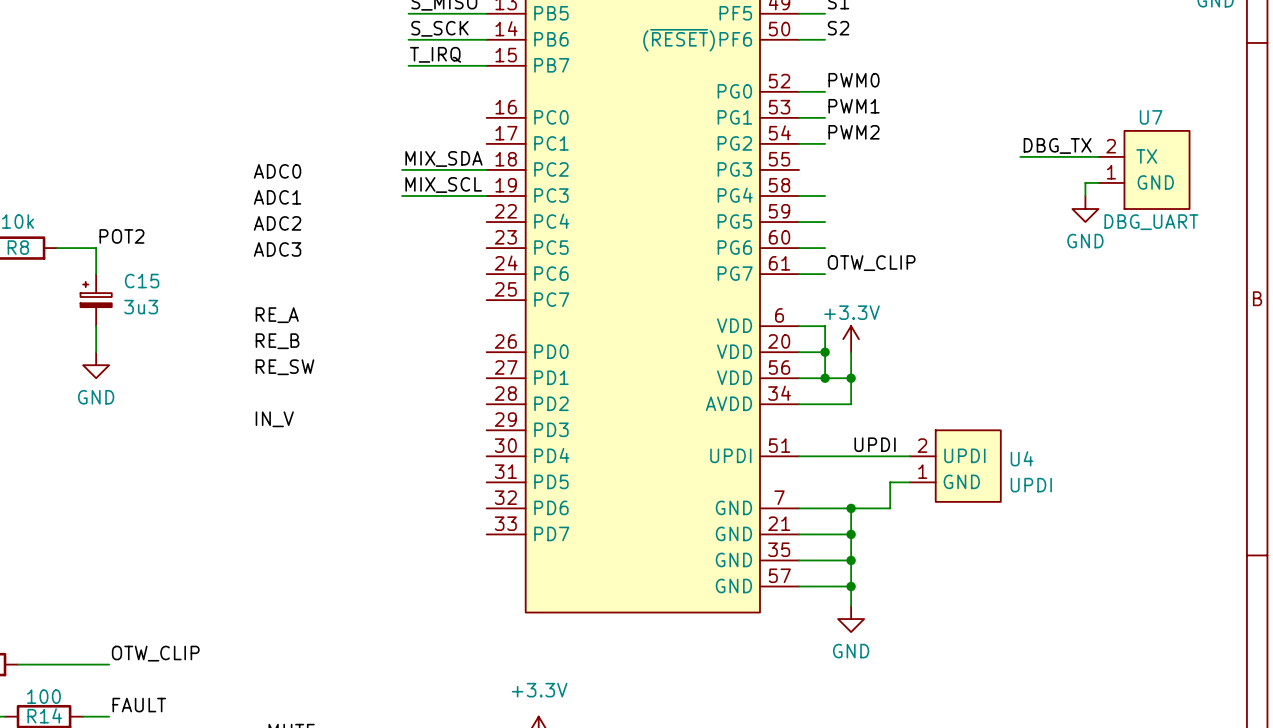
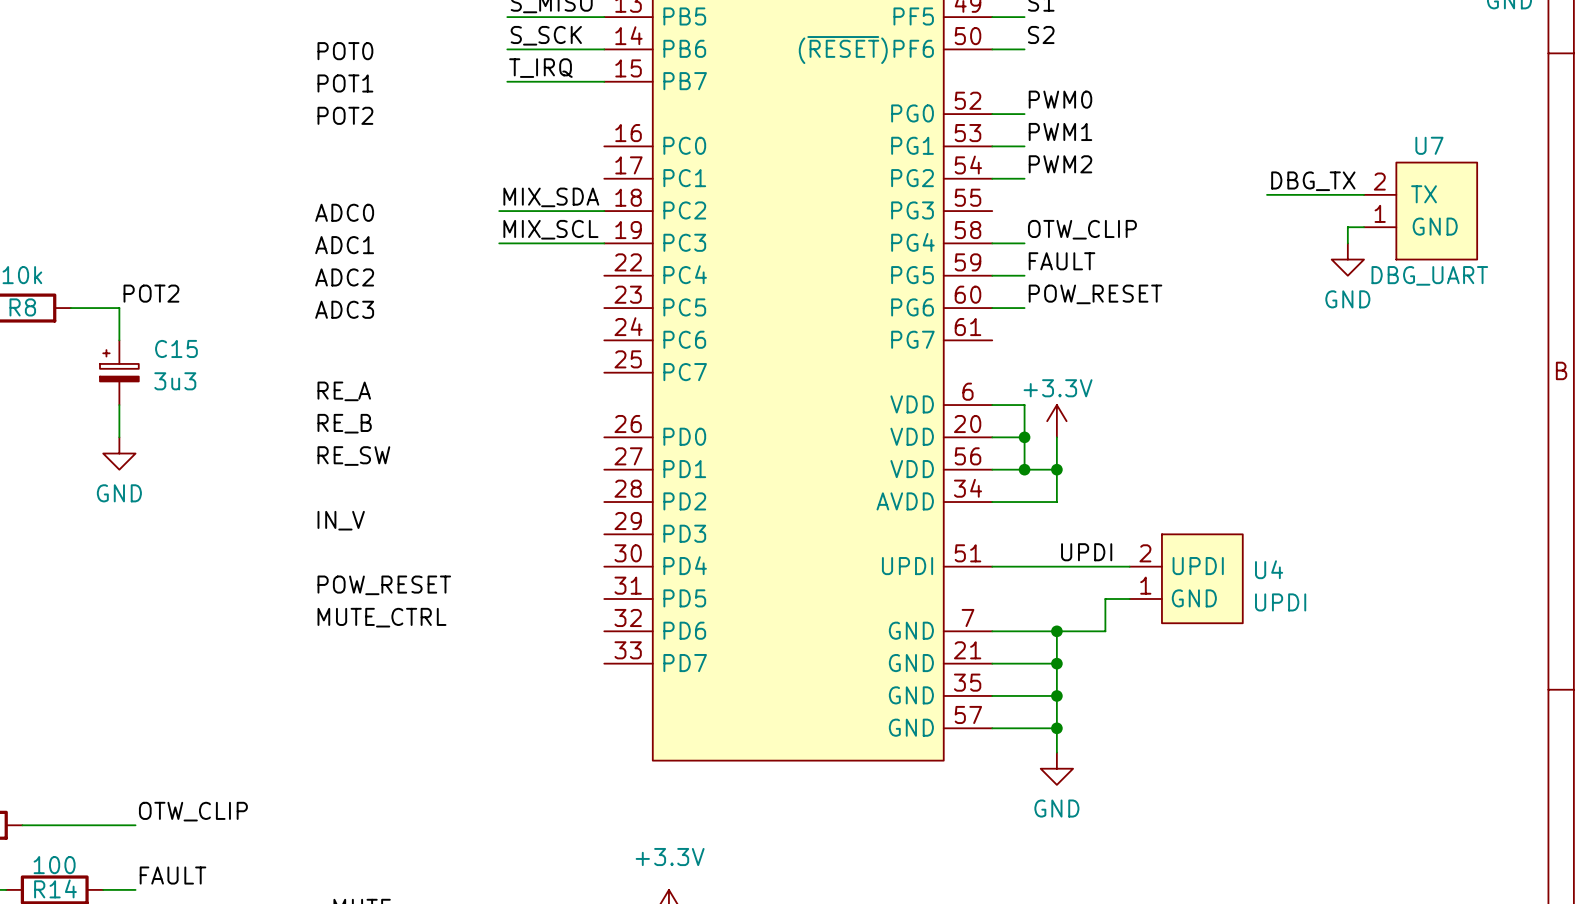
label: none -> POT0 (345, 51)
label: none -> POT1 (345, 83)
label: none -> POT2 (345, 115)
label: none -> FAULT (1062, 261)
label: none -> POW_RESET (1095, 294)
label position: OTW_CLIP (871, 263) -> OTW_CLIP (1082, 229)
wire: (799, 274) (825, 274) -> none
label: none -> POW_RESET (384, 585)
label: none -> MUTE_CTRL (381, 617)

